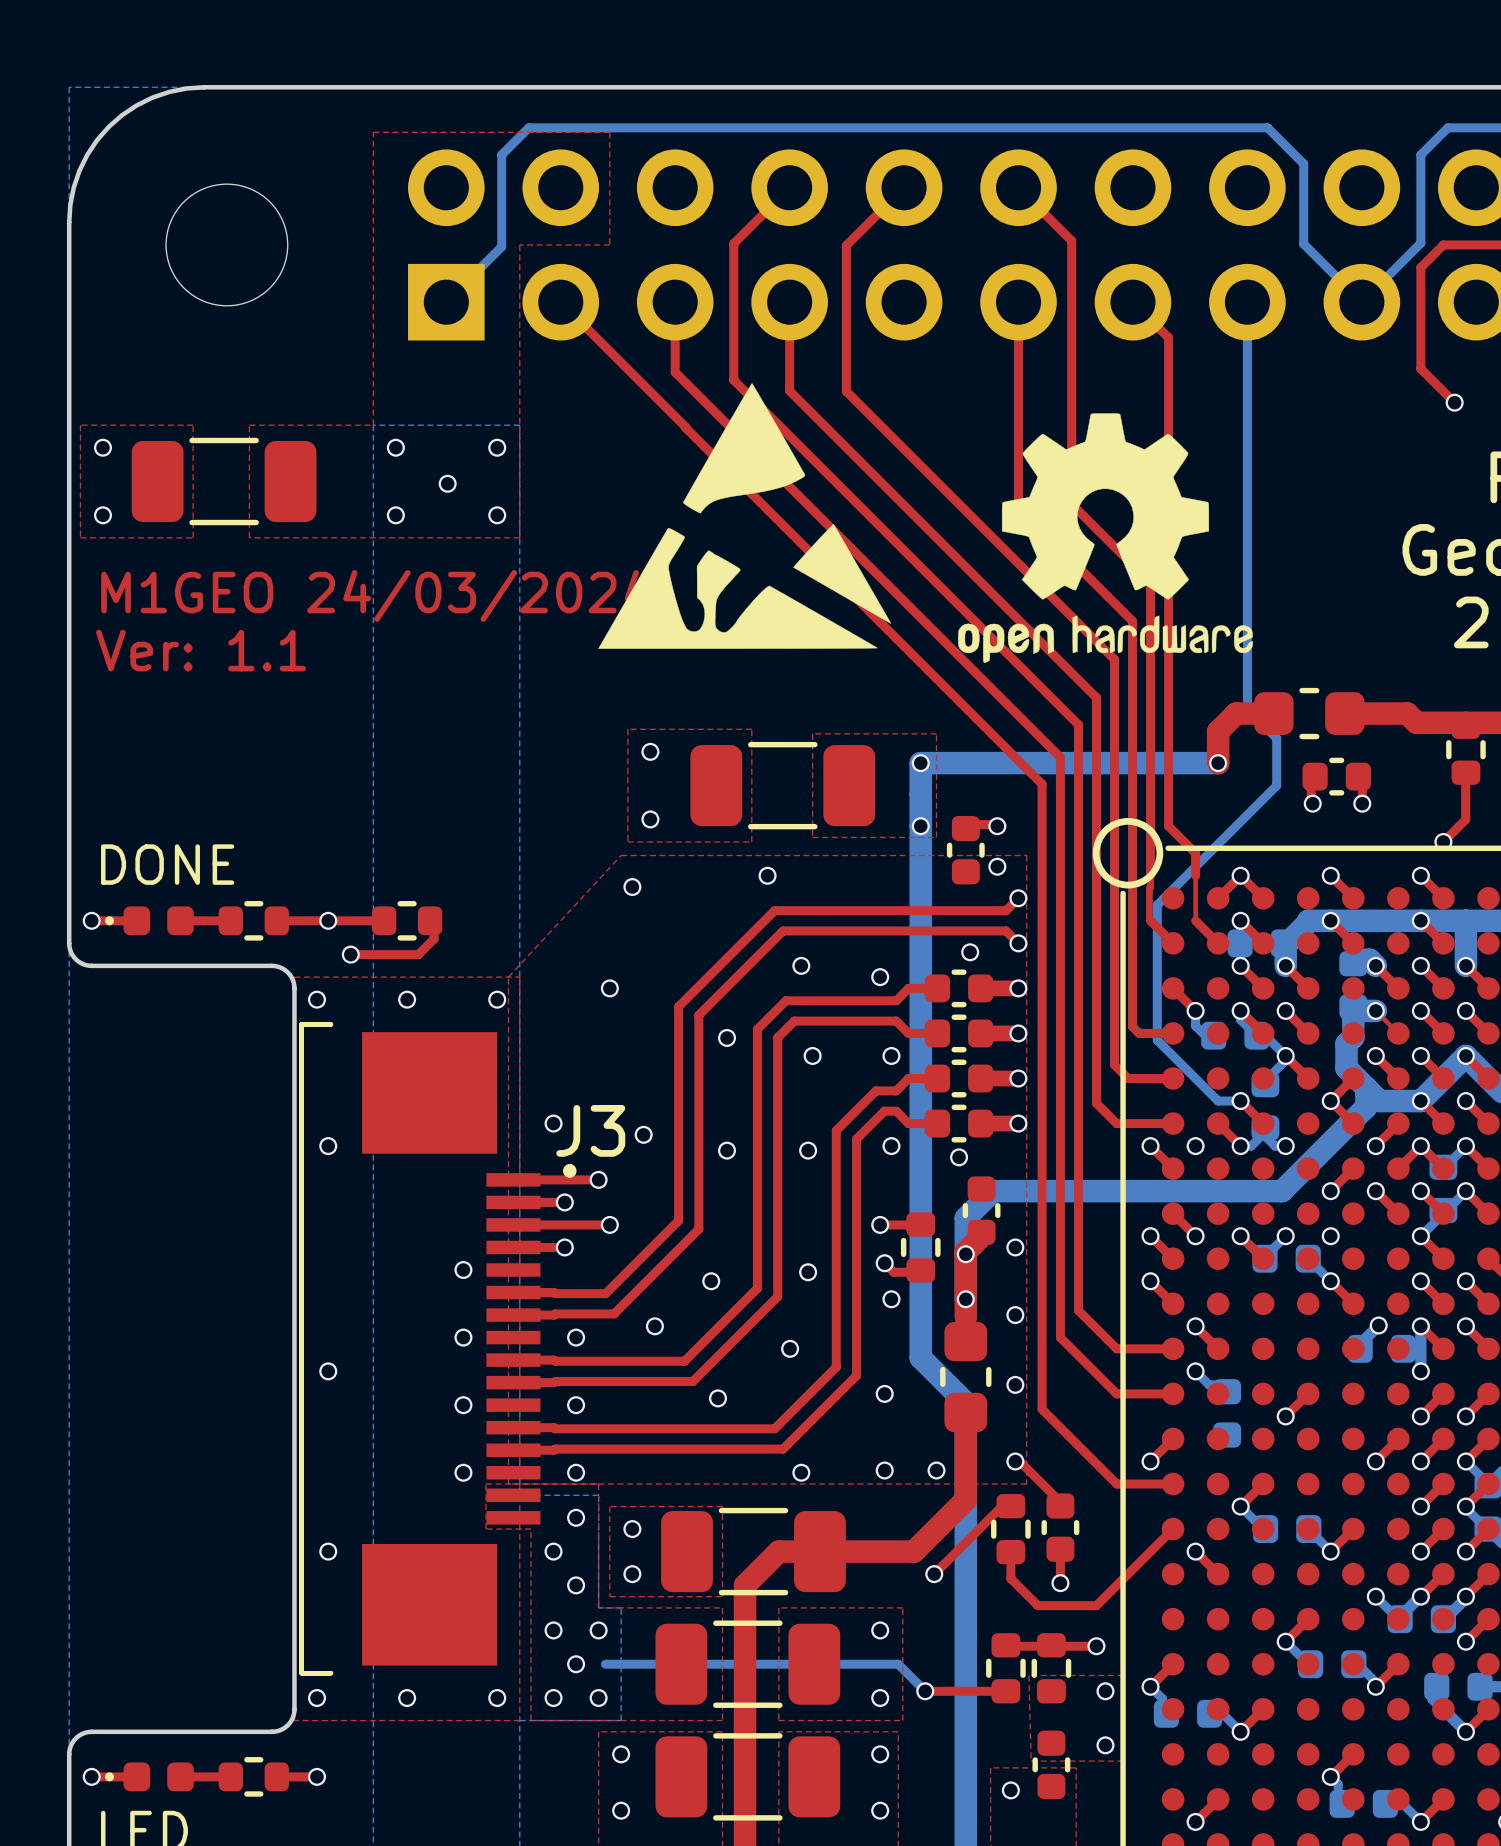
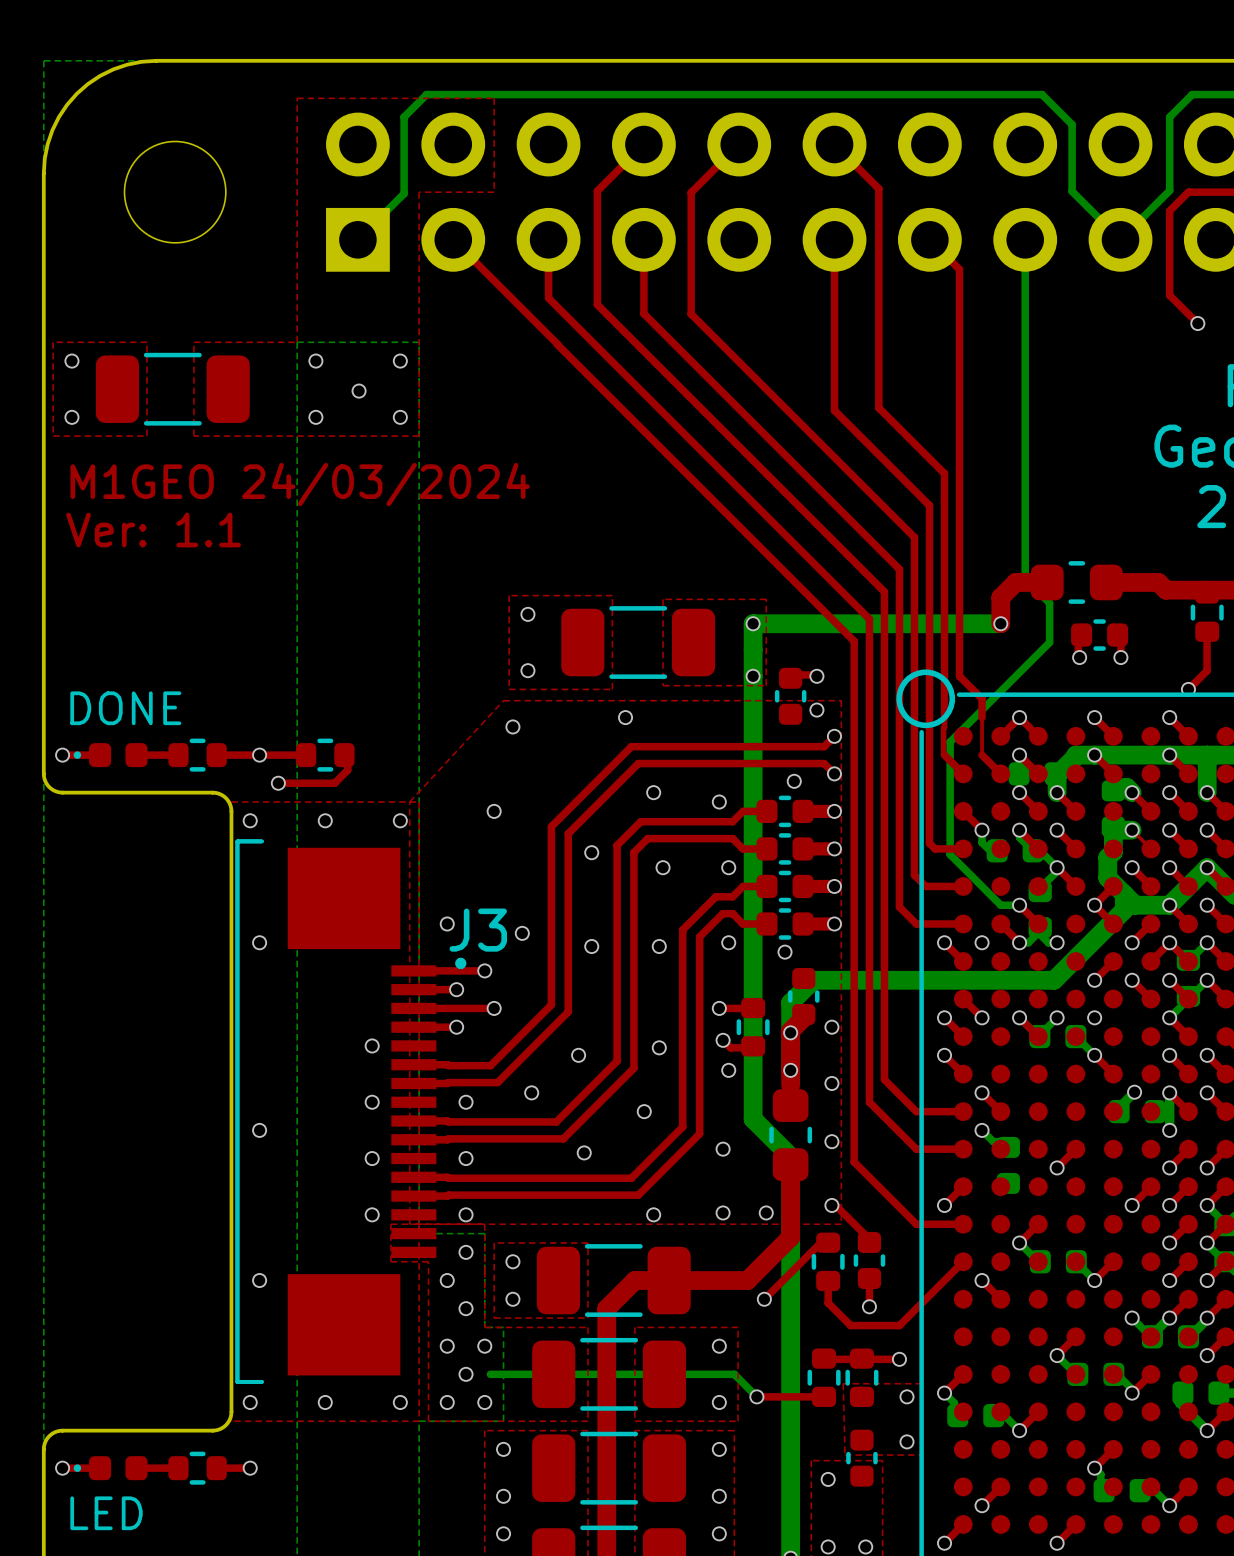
drawing: [598, 383, 892, 649] -> none
drawing: [958, 413, 1253, 663] -> none

